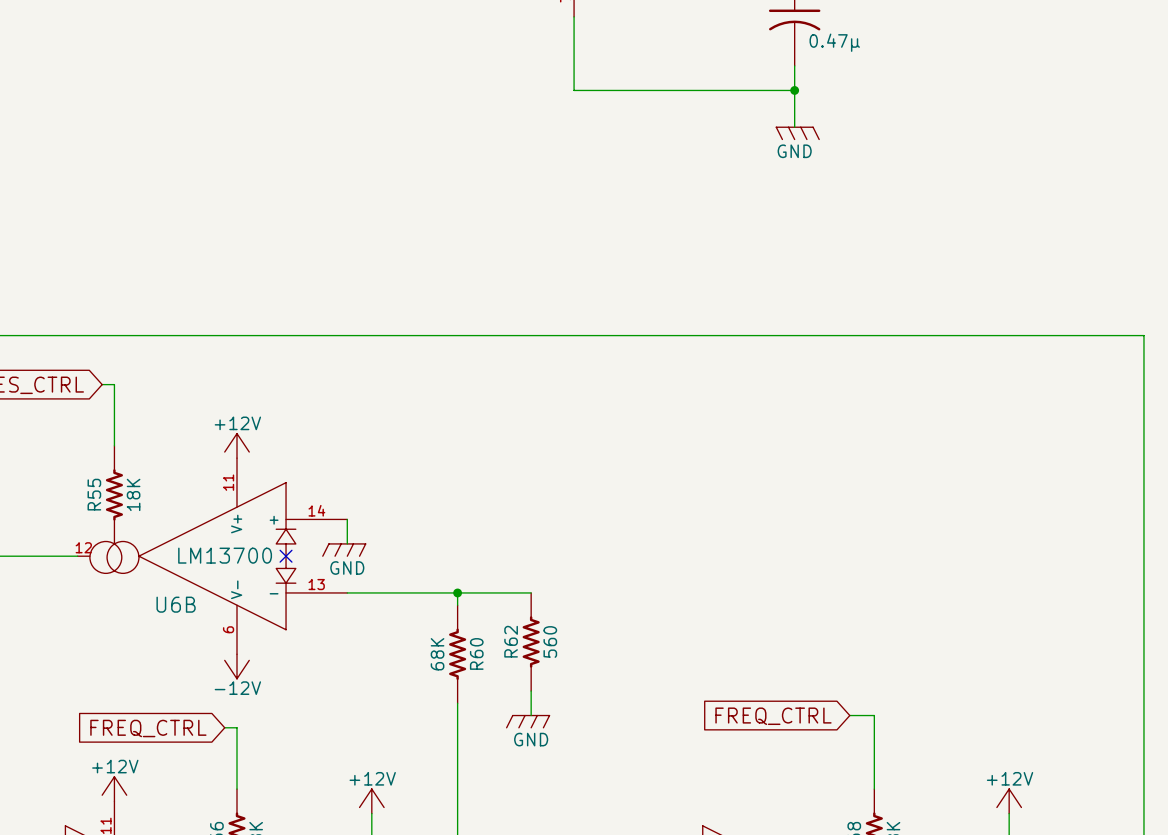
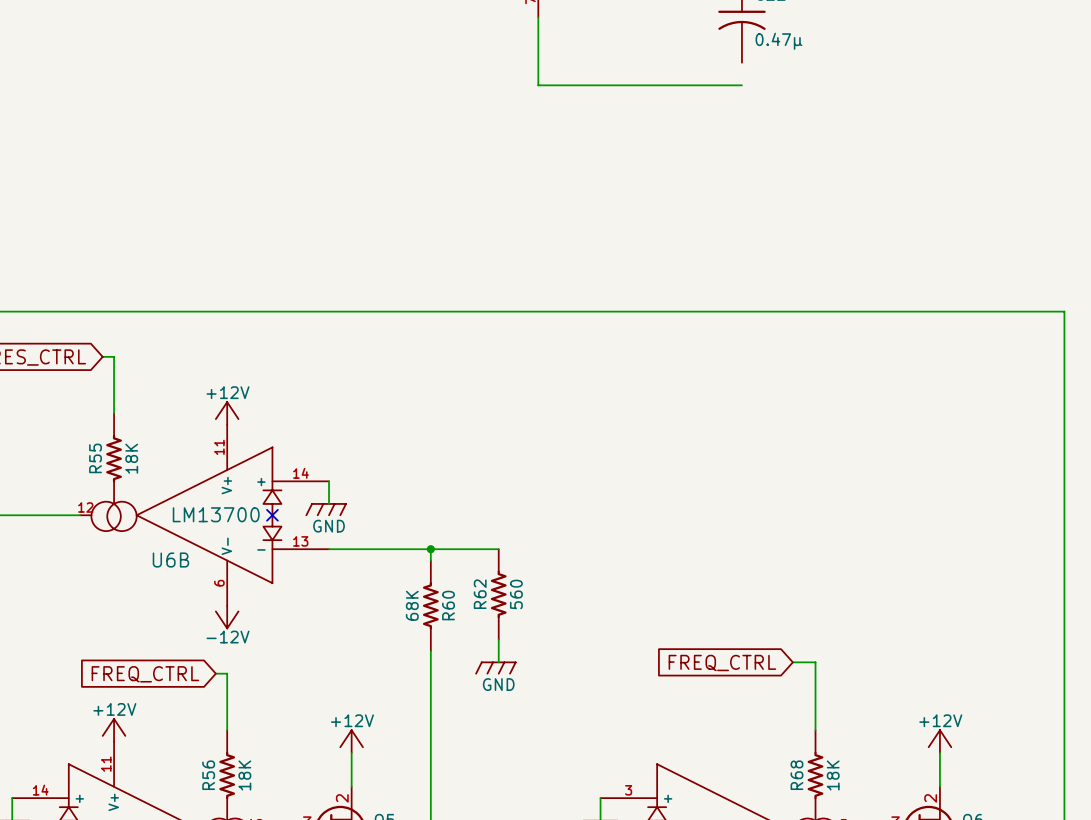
wire: (794, 65) (794, 127) -> none
junction: (794, 90) -> none
power symbol: GND (797, 133) -> none

